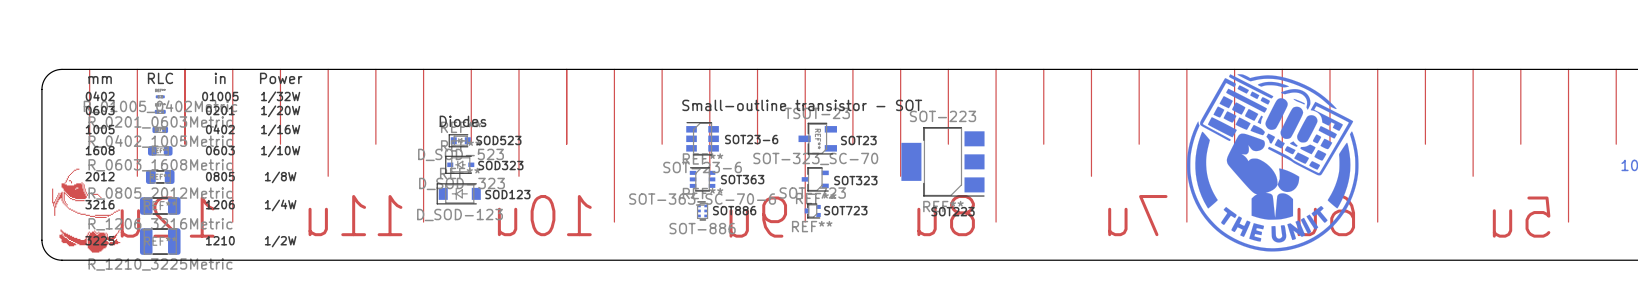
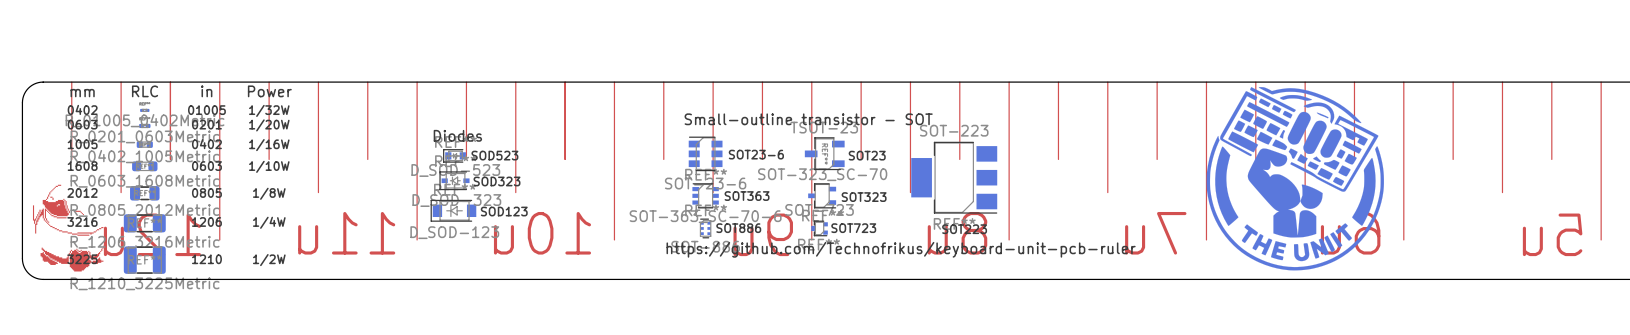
text: none -> https://github.com/Technofrikus/keyboard-unit-pcb-ruler (901, 249)

